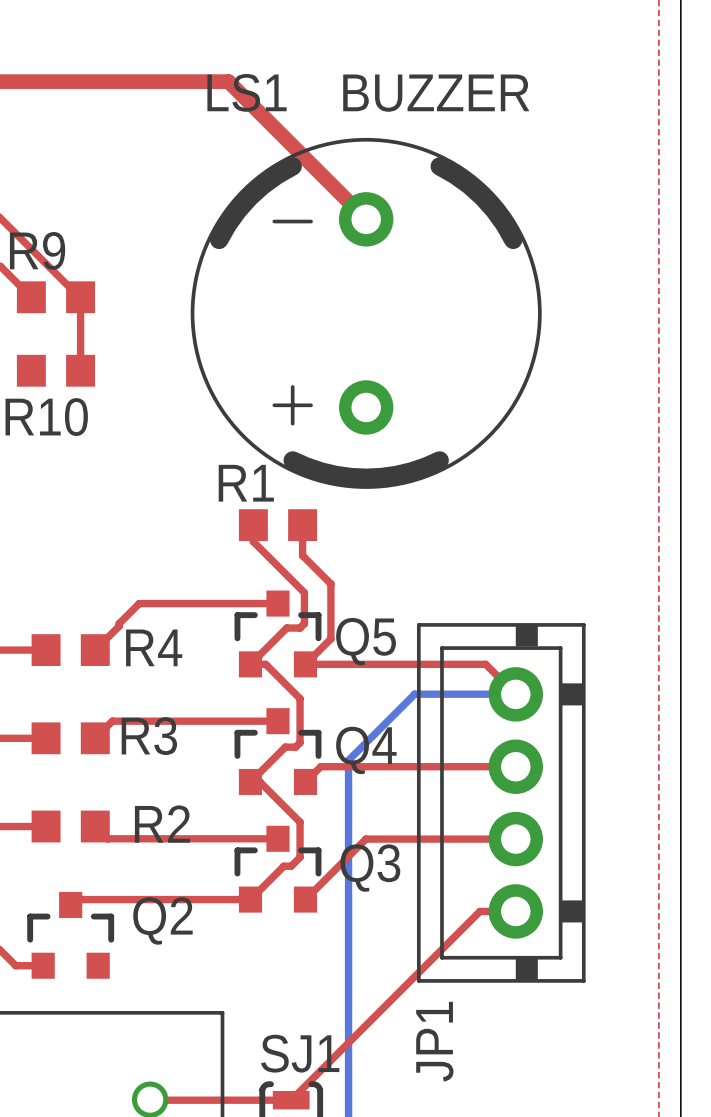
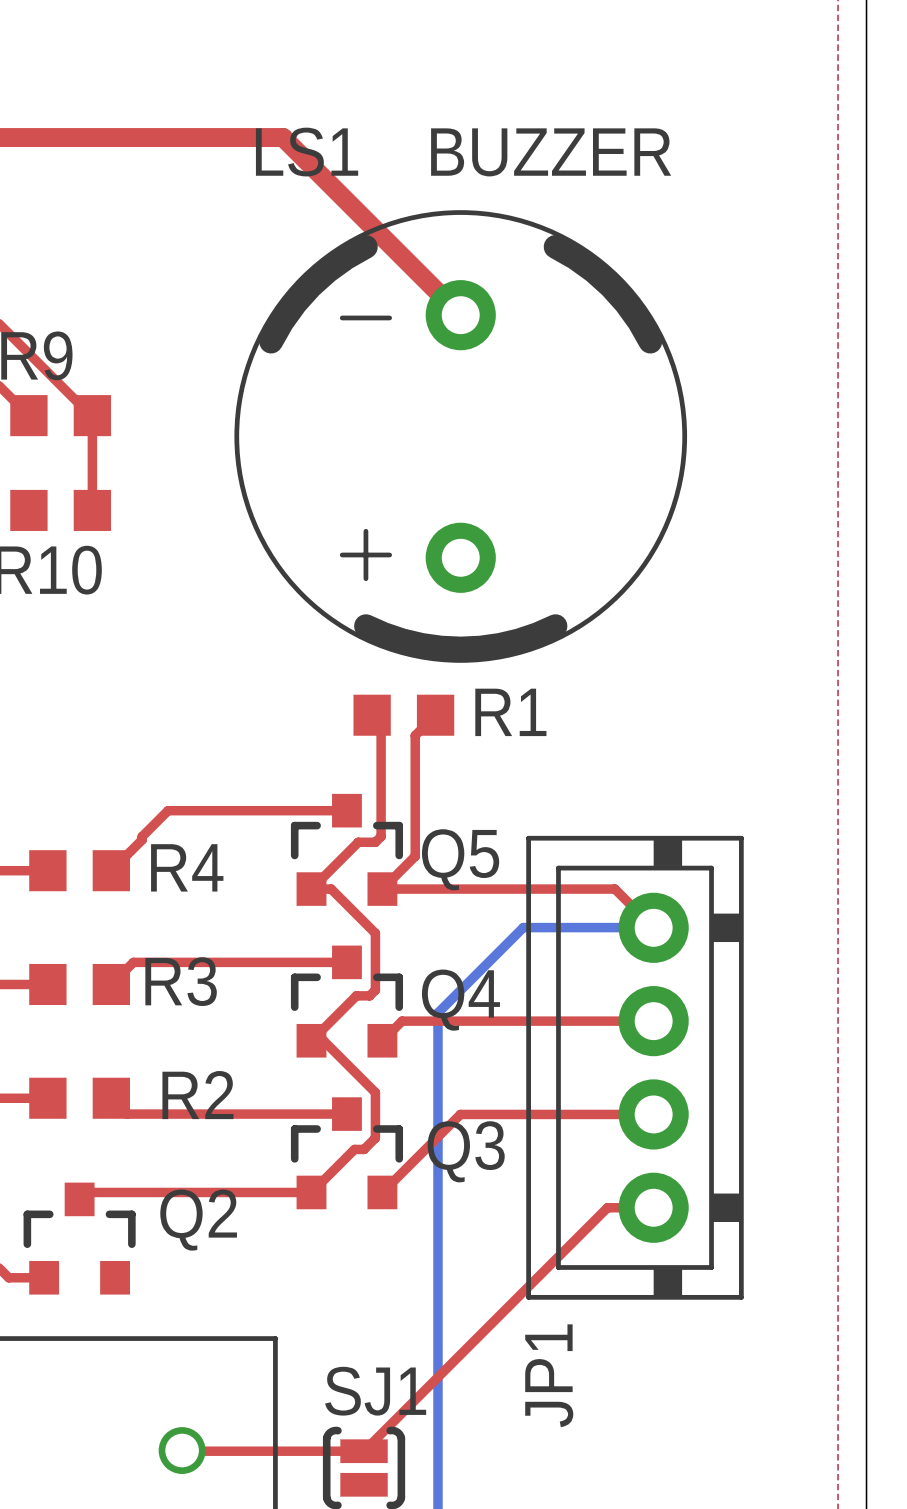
R1 name position: R1 (246, 483) -> R1 (510, 712)
top track: (253, 525) (253, 541) (304, 592) -> (372, 715) (381, 724) (381, 796)
R1 position: (277, 525) -> (403, 715)
top track: (302, 525) (302, 555) (330, 583) -> (435, 715) (415, 735) (415, 785)

